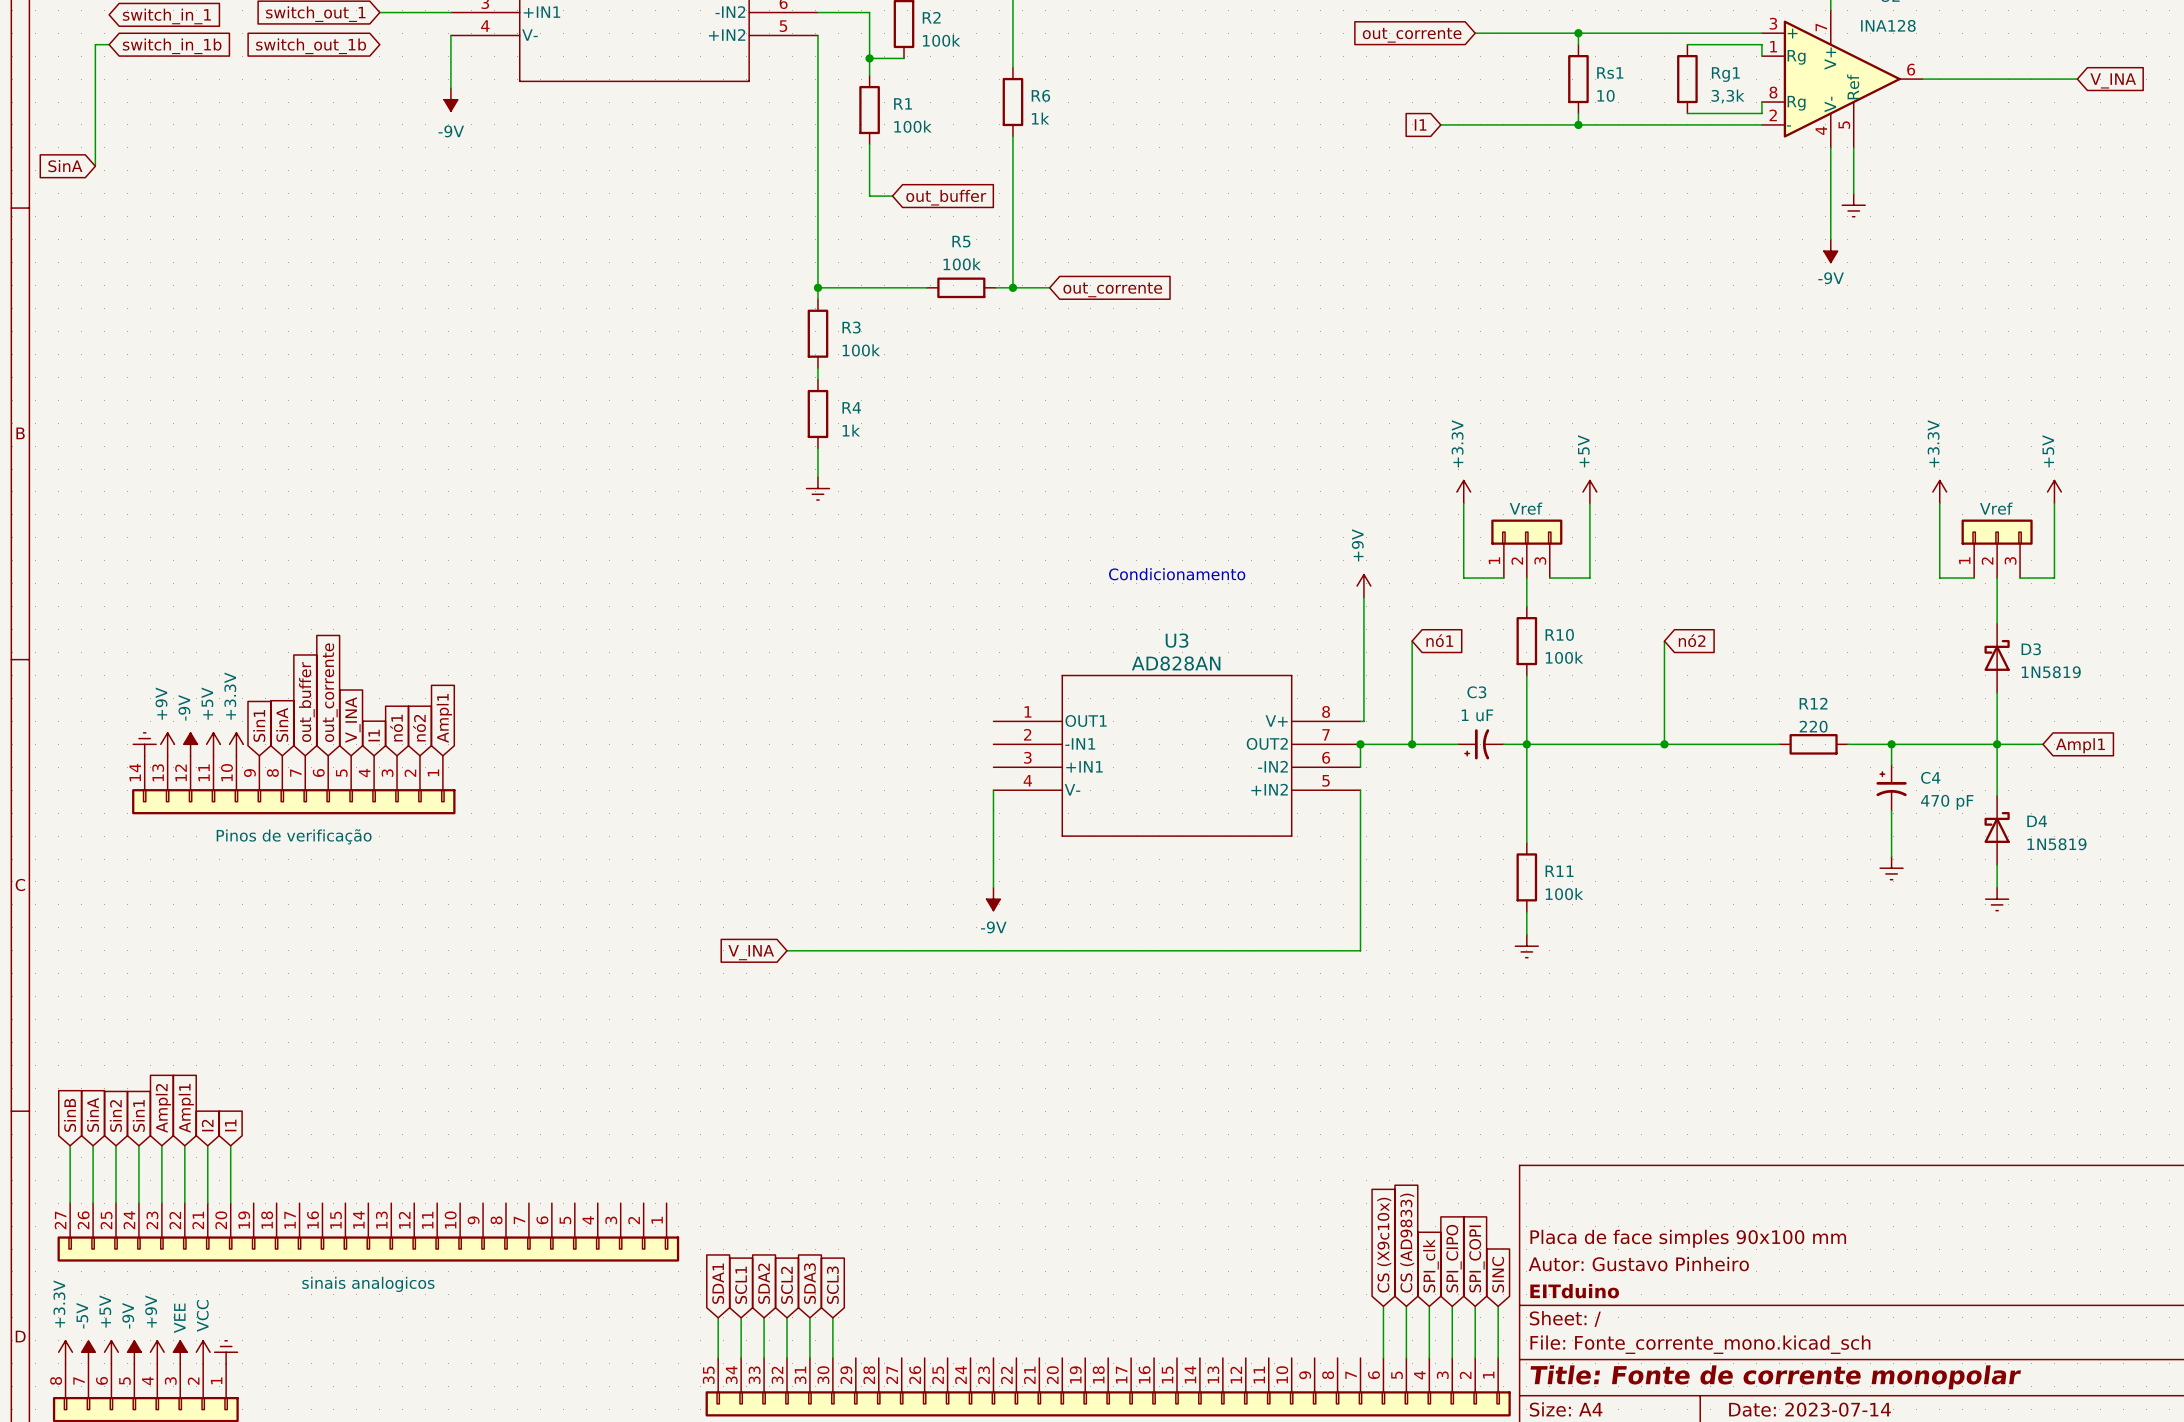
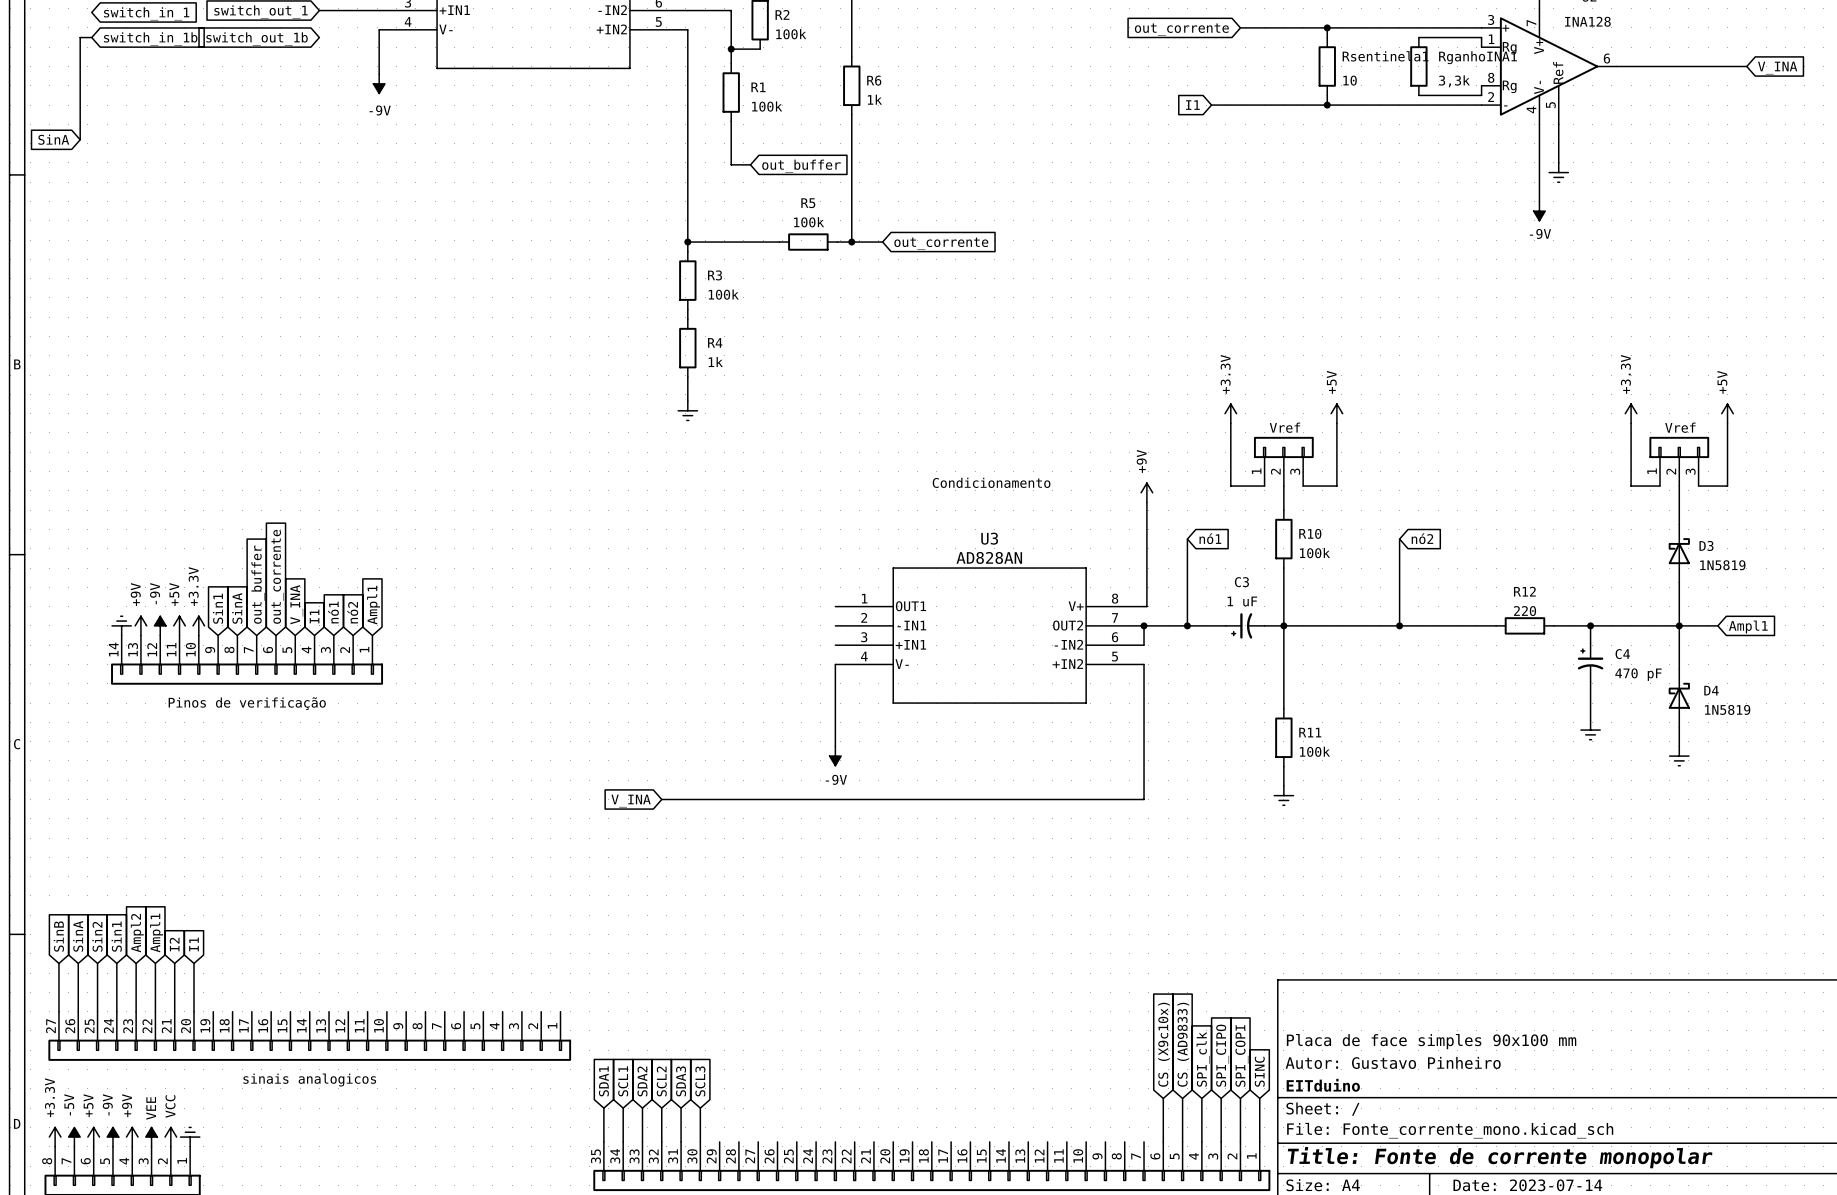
Rs1 name: Rs1 (1610, 73) -> Rsentinela1 (1385, 56)
Rg1 name: Rg1 (1725, 74) -> RganhoINA1 (1478, 57)

